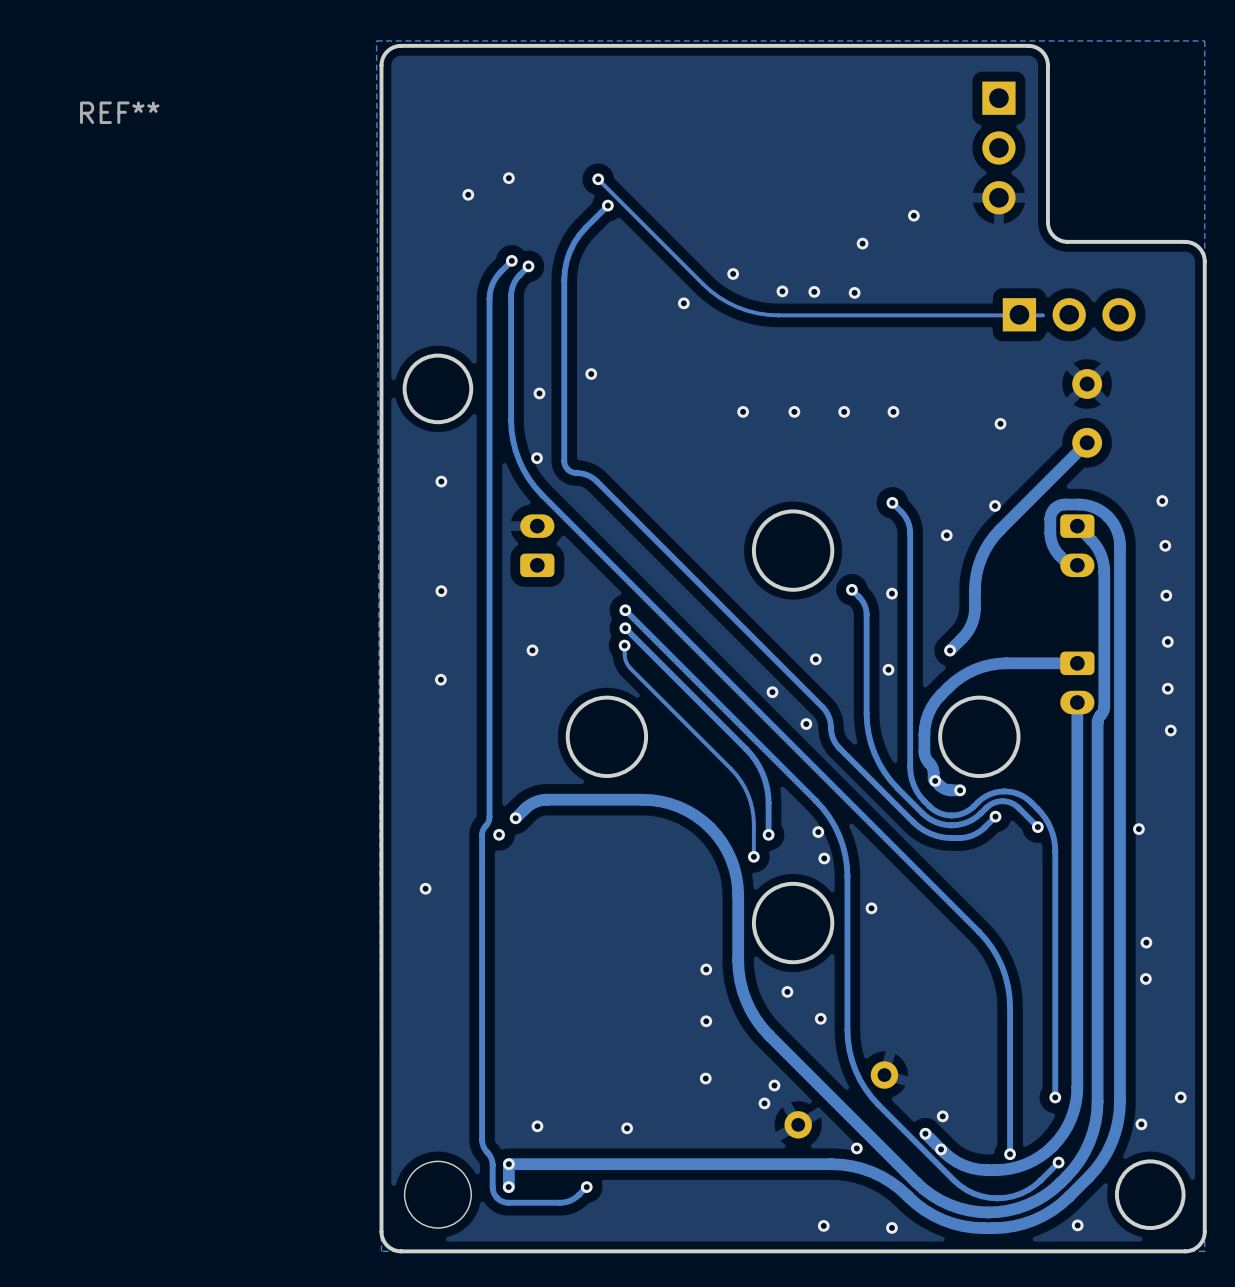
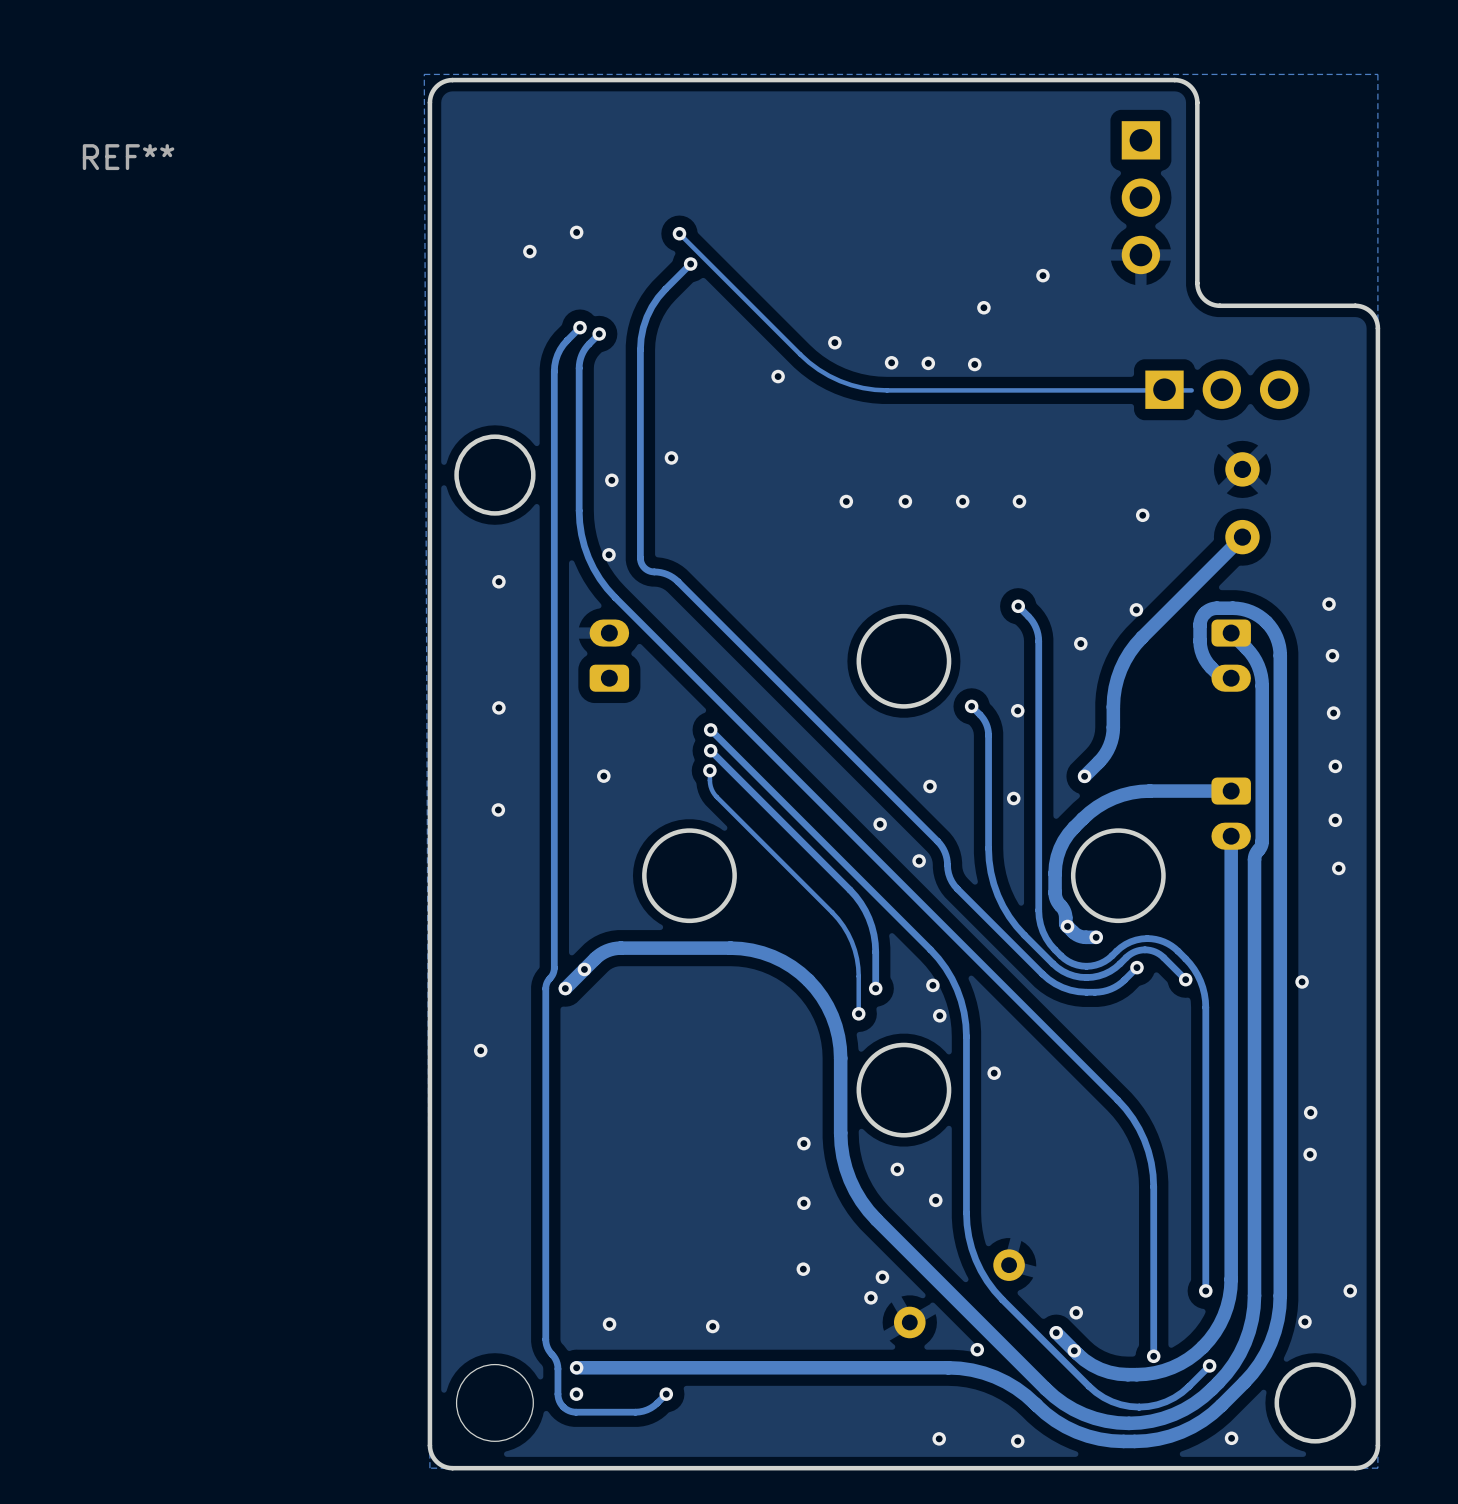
track: none -> (584, 969) (565, 988)
track: (508, 1164) (508, 1186) -> none

